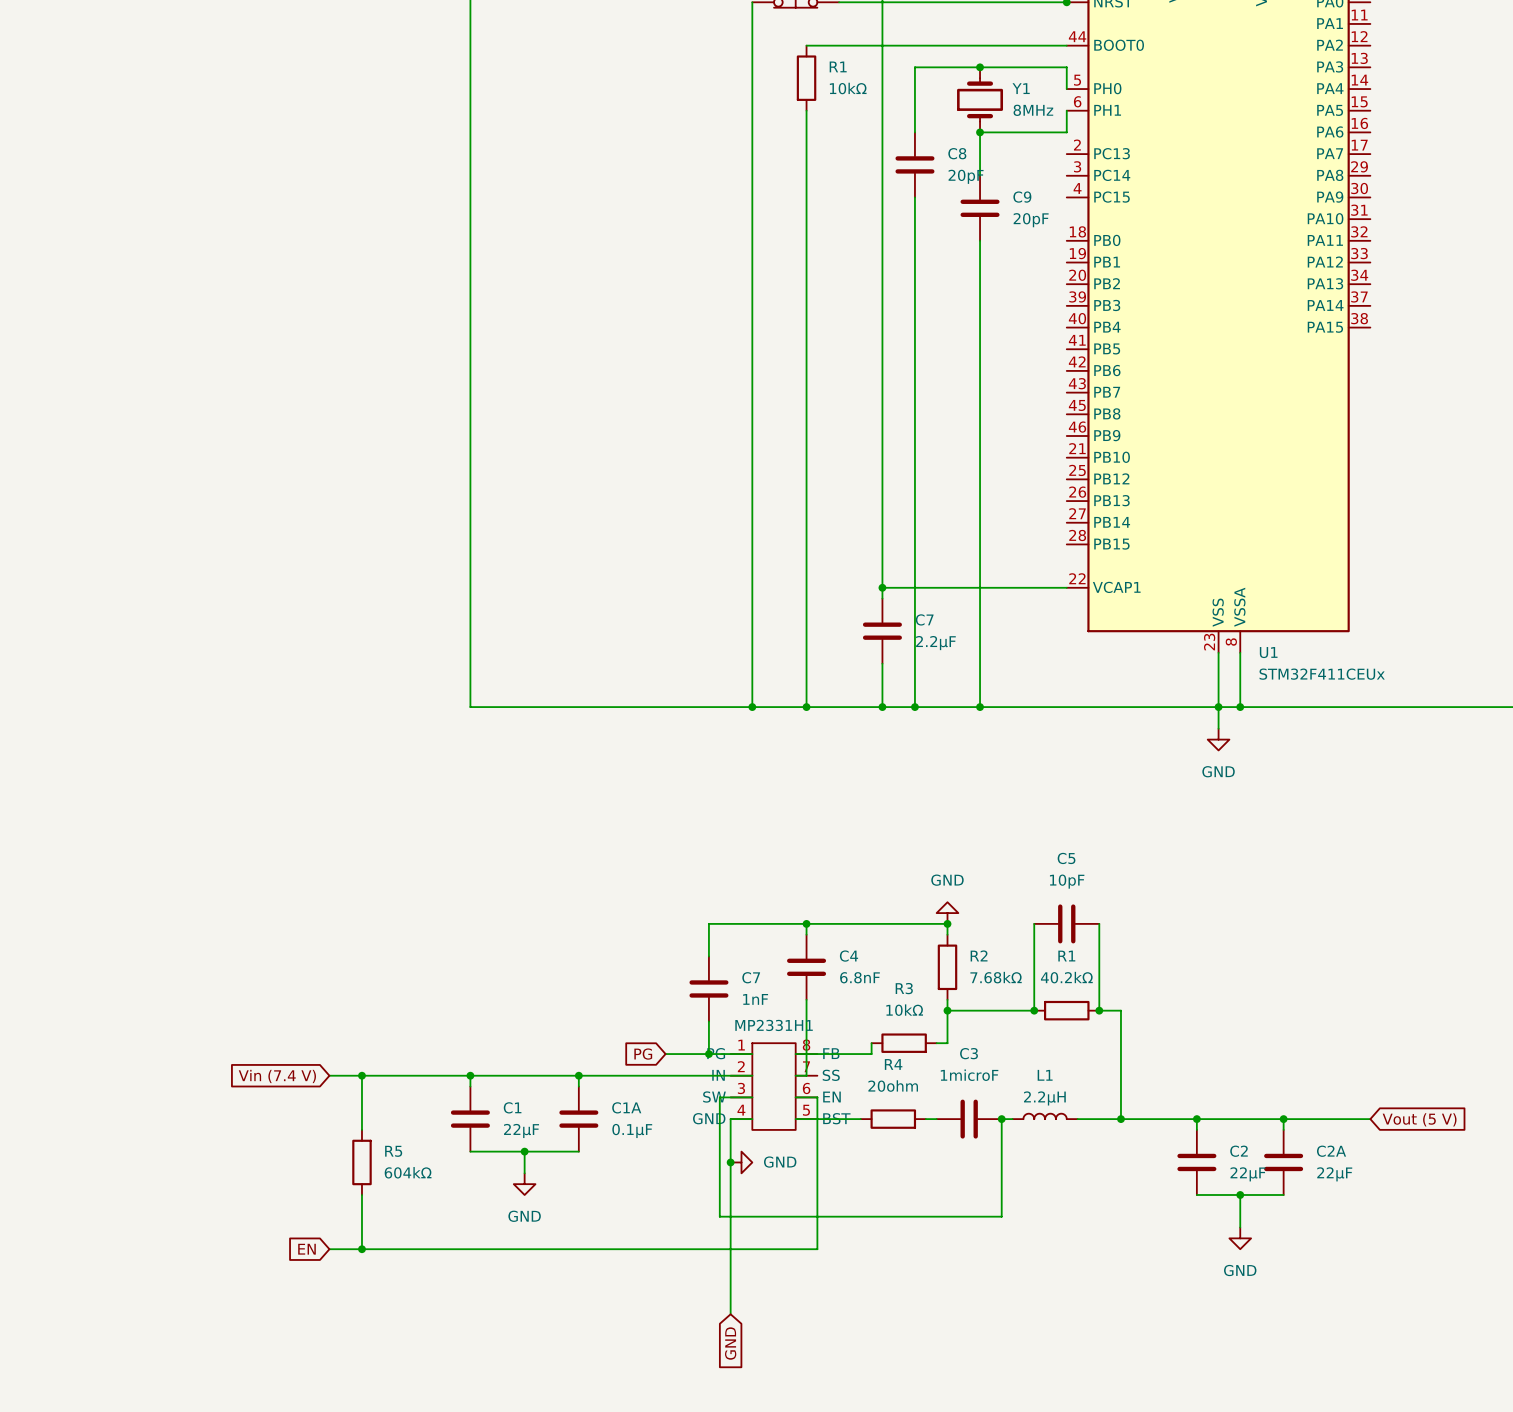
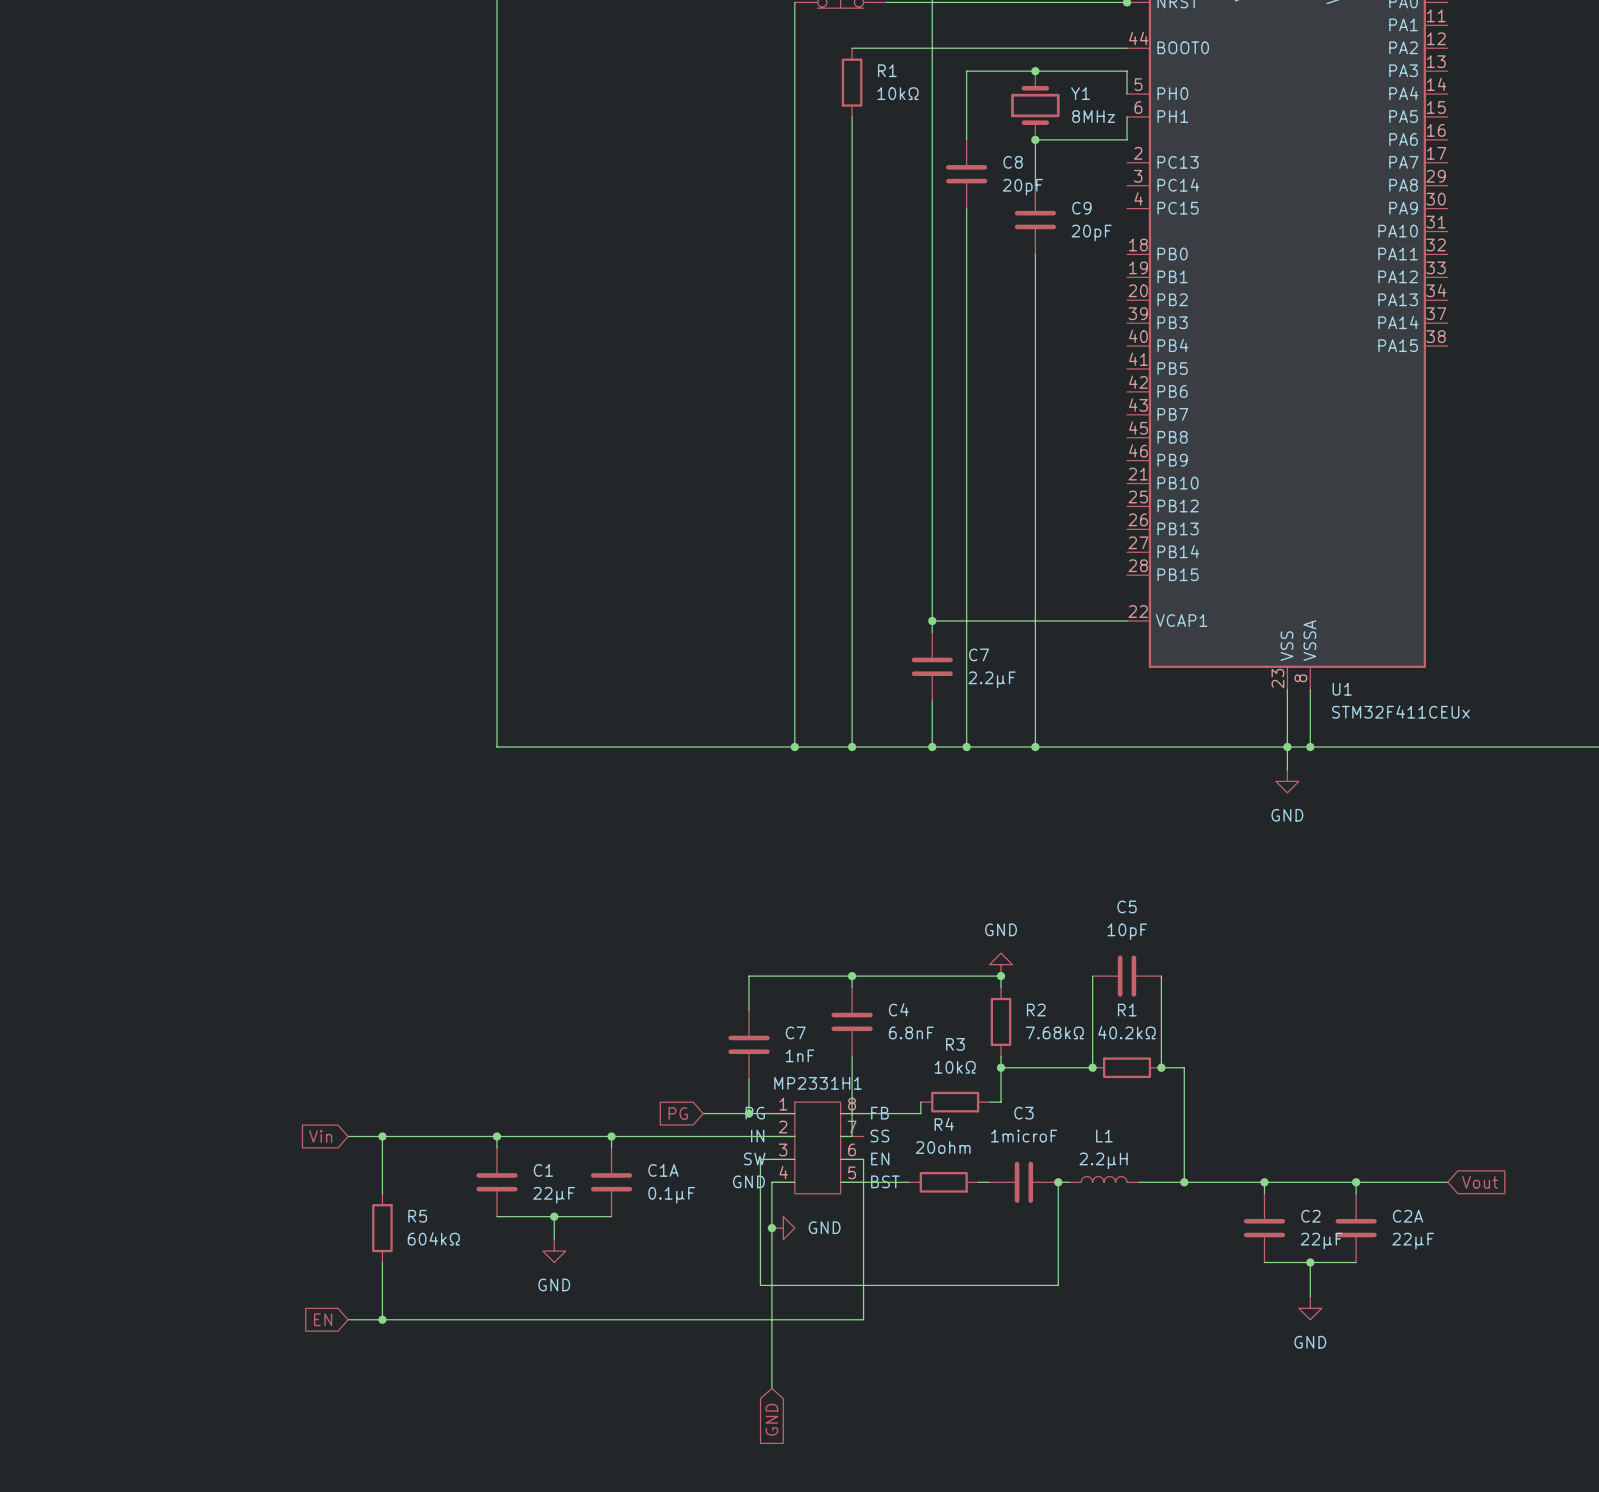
global label: Vin (7.4 V) (277, 1076) -> Vin (320, 1136)
global label: Vout (5 V) (1419, 1119) -> Vout (1480, 1182)

